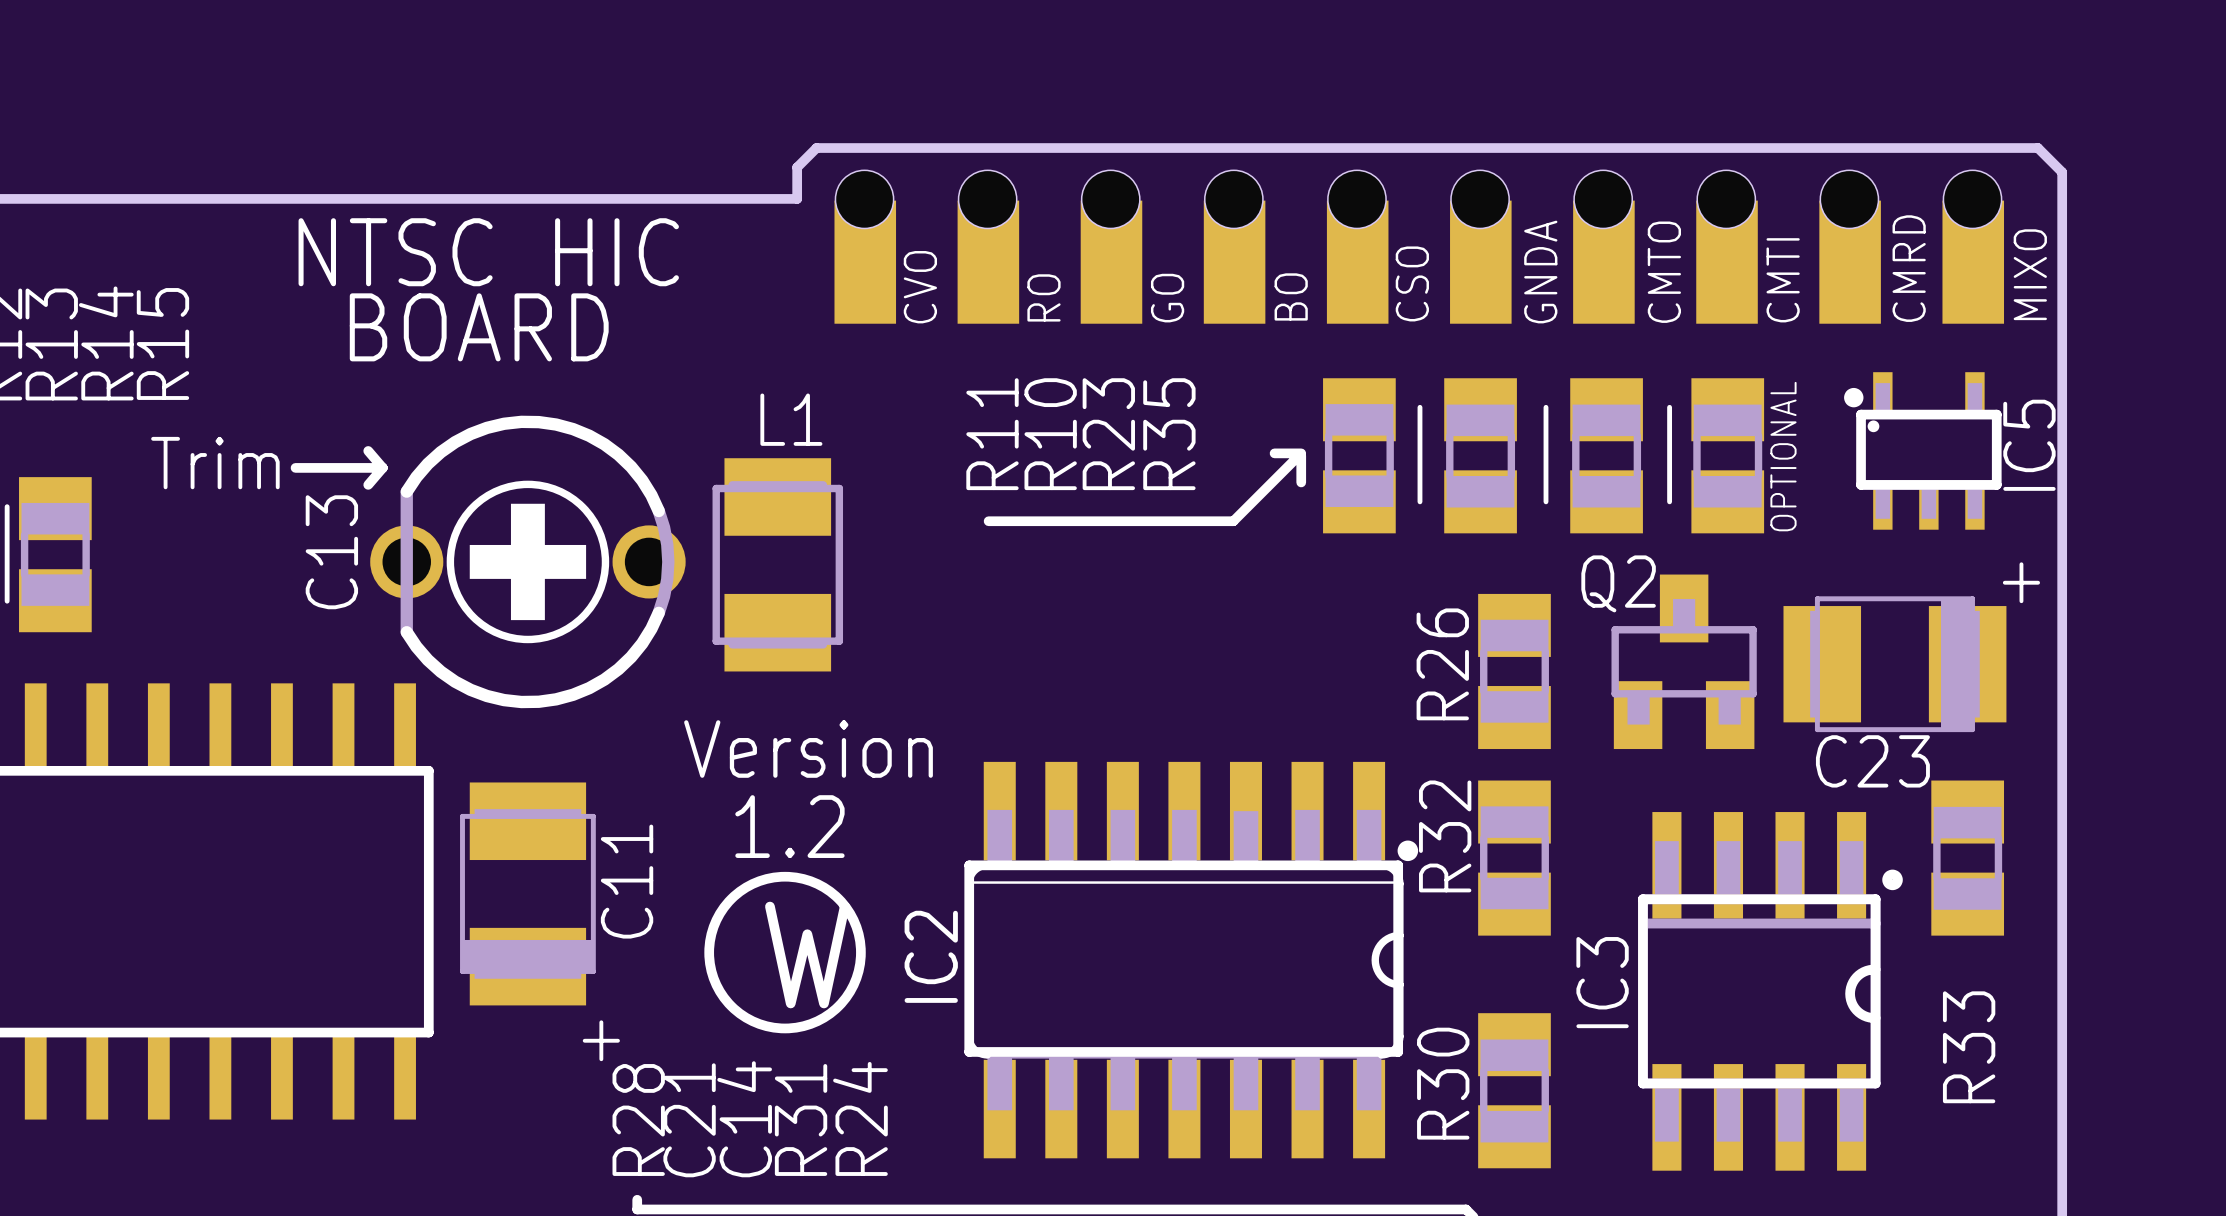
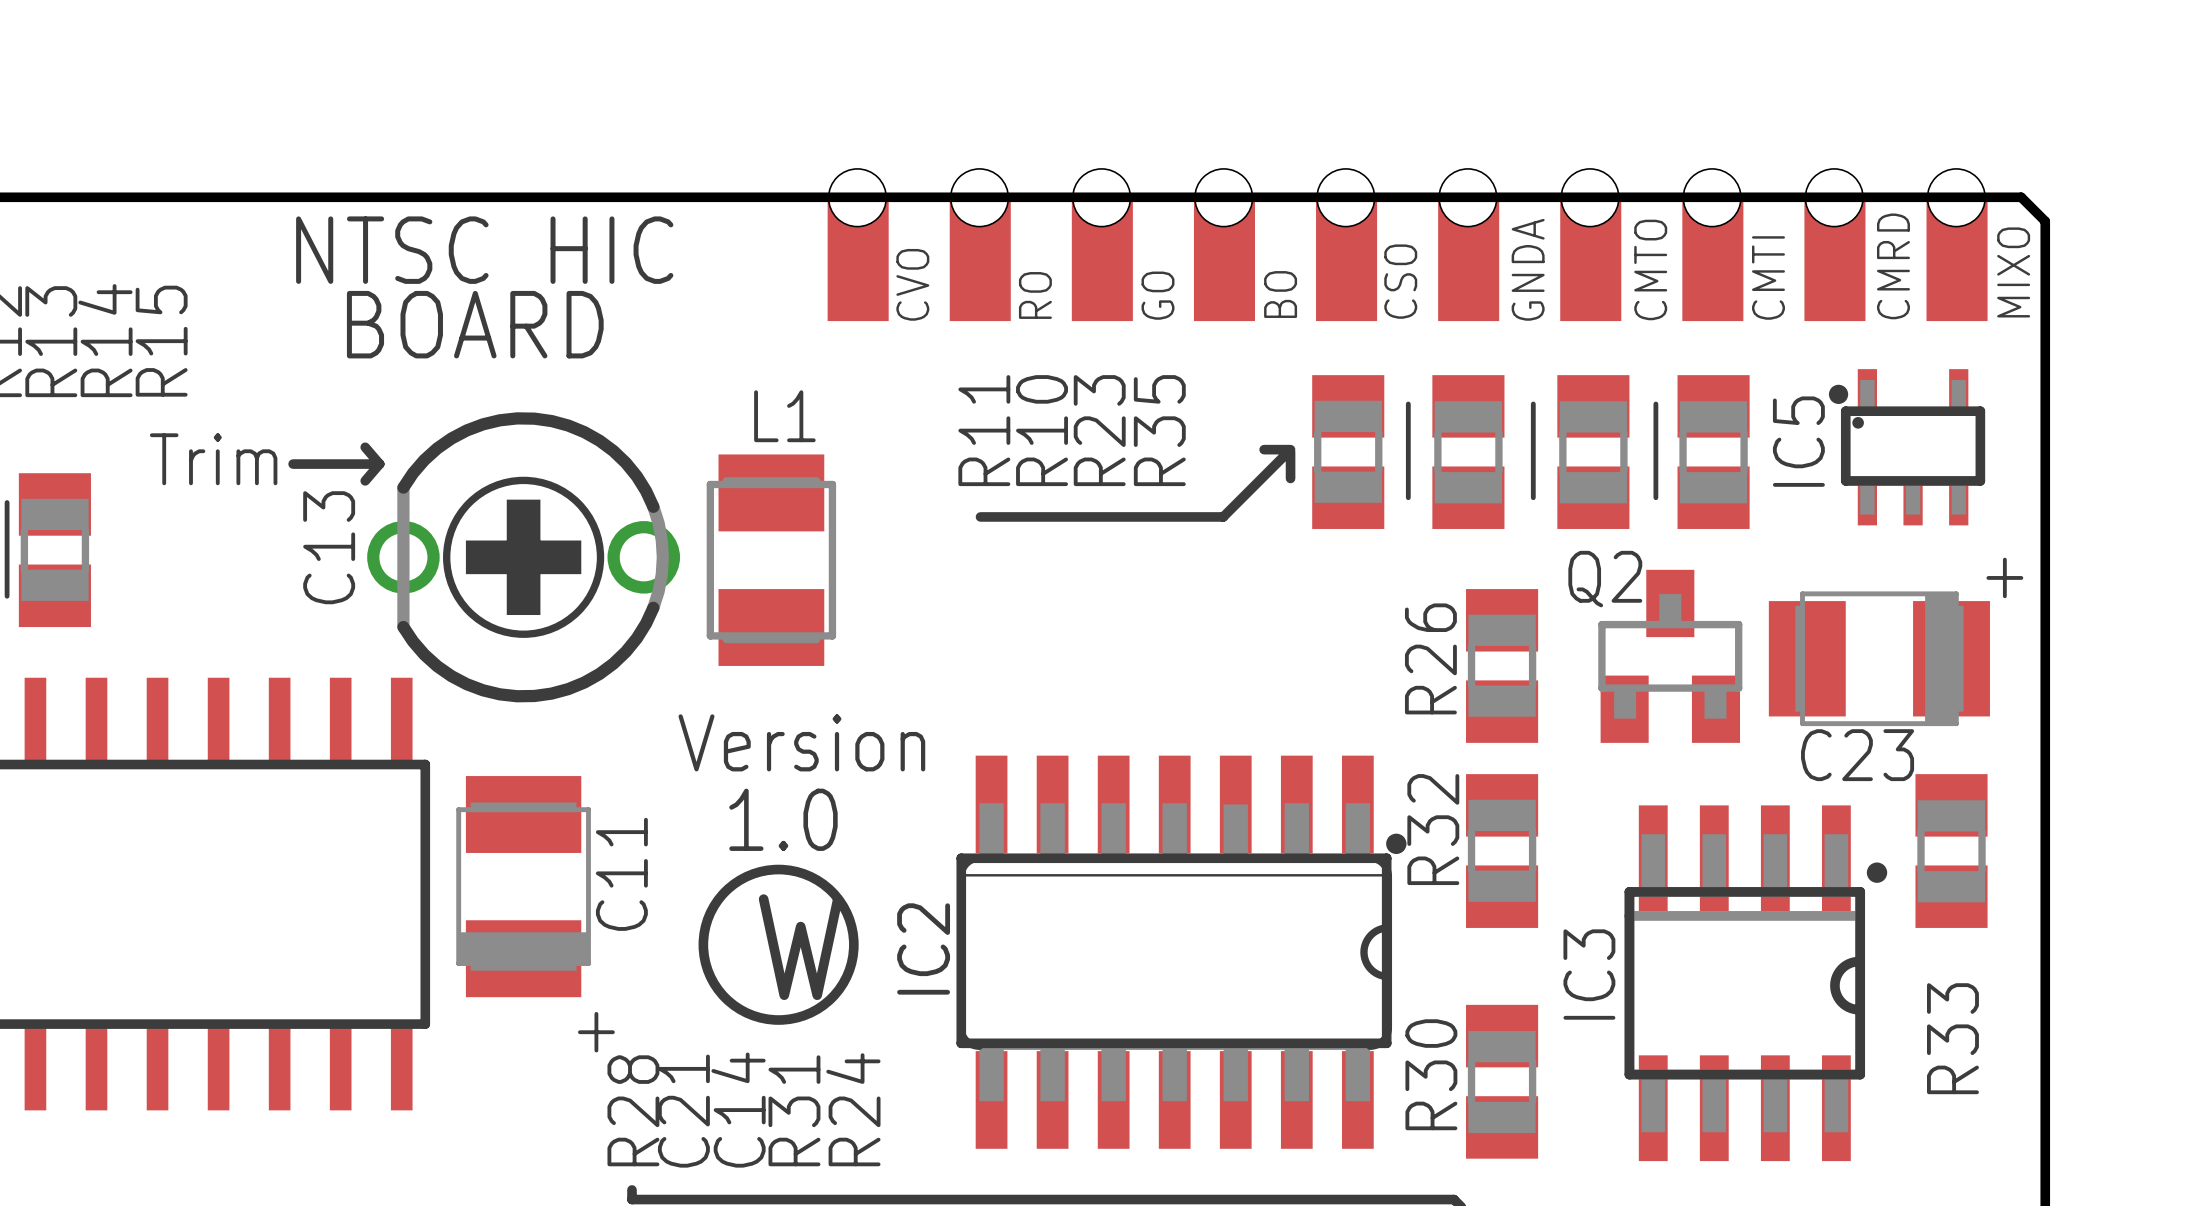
board edge: (797, 198) (797, 167) (816, 148) (2037, 148) (2062, 172) (2062, 223) -> (790, 197) (2021, 197) (2045, 221)
IC5 name position: IC5 (2029, 445) -> IC5 (1798, 441)
text: OPTIONAL (1783, 456) -> none
text: 1.2 (789, 826) -> 1.0 (783, 819)

